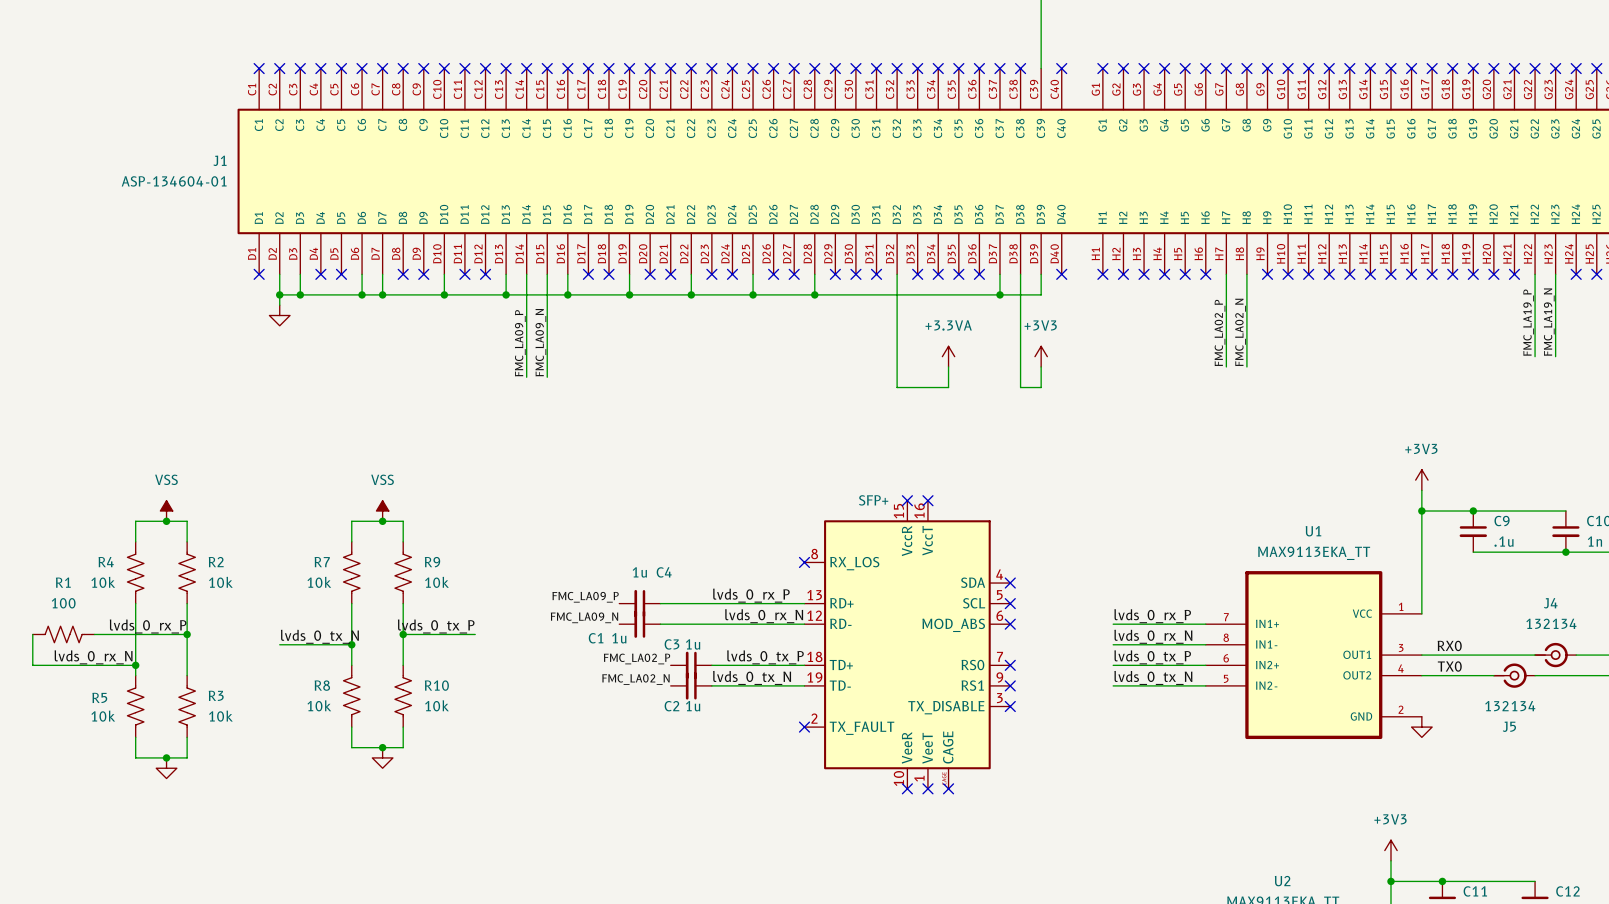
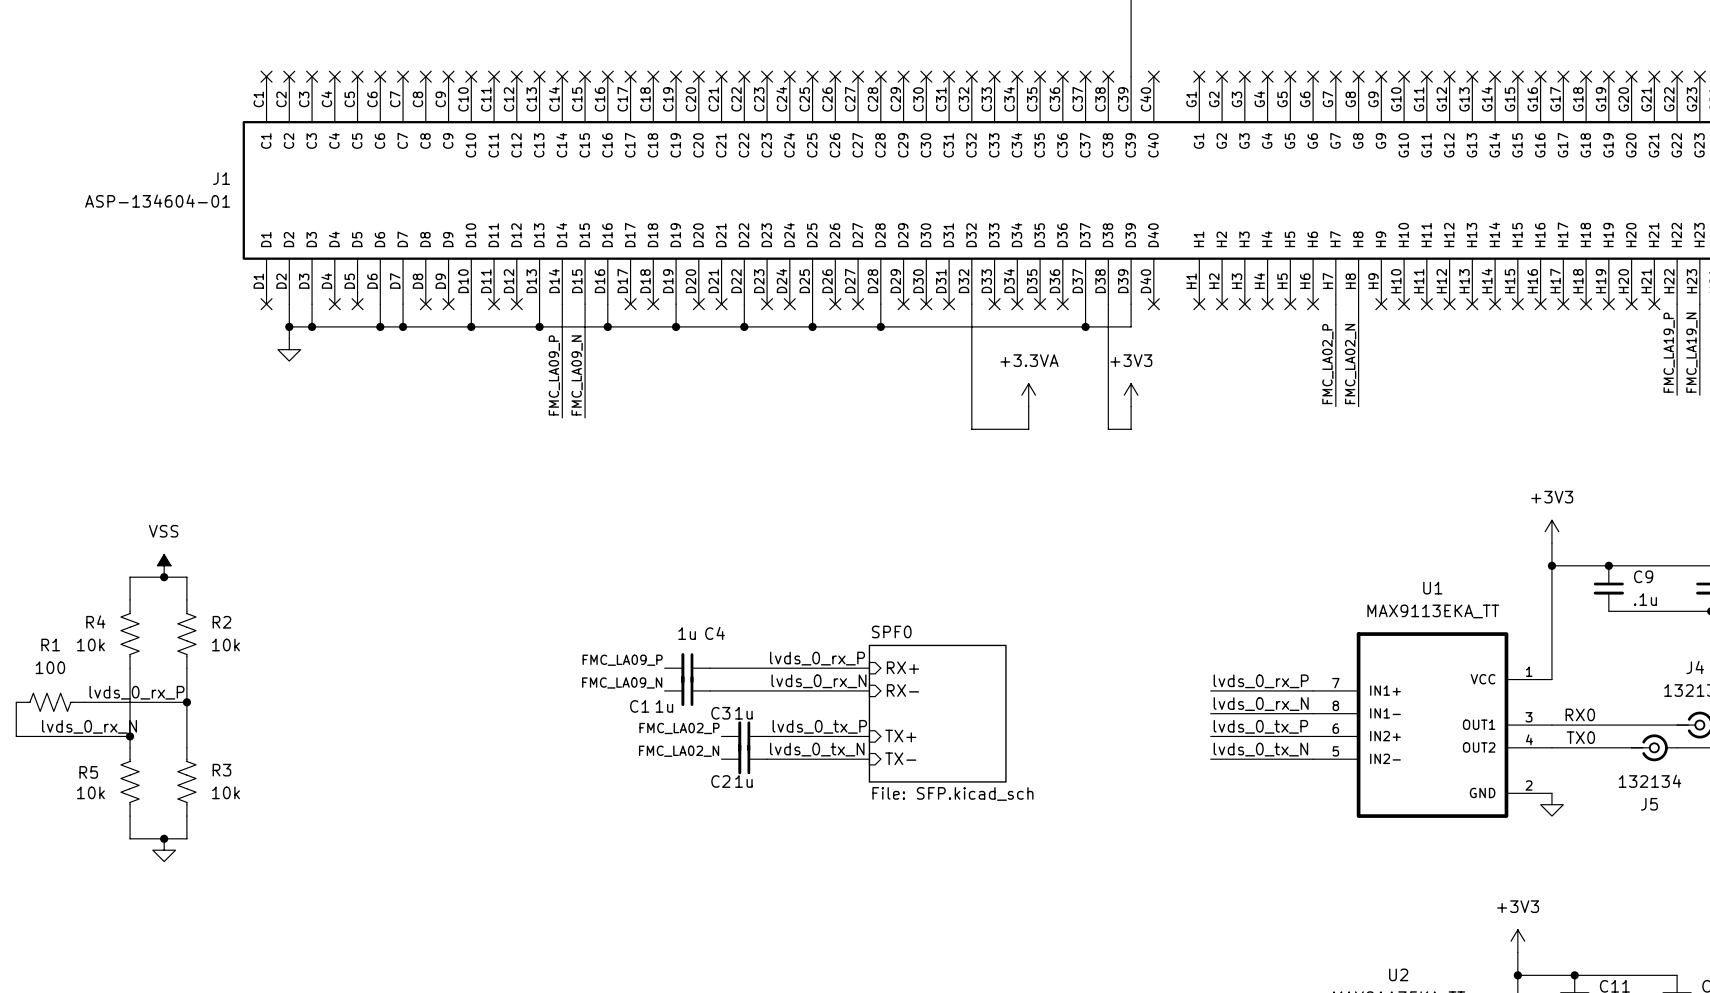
no-connect mark: (907, 500) -> none
no-connect mark: (927, 500) -> none
power symbol: VSS (382, 511) -> none
junction: (382, 521) -> none
wire: (351, 541) (351, 521) (403, 521) (403, 541) -> none
no-connect mark: (804, 562) -> none
R7: 10k (351, 572) -> none
R9: 10k (403, 572) -> none
no-connect mark: (1010, 583) -> none
wire: (351, 603) (351, 665) -> none
wire: (403, 603) (403, 665) -> none
sheet pin: none -> RX+ (902, 667)
no-connect mark: (1010, 603) -> none
sheet pin: none -> RX- (902, 690)
no-connect mark: (1010, 624) -> none
label: lvds_0_tx_P (436, 626) -> none
wire: (403, 634) (475, 634) -> none
junction: (403, 634) -> none
label: lvds_0_tx_N (319, 636) -> none
wire: (279, 644) (351, 644) -> none
junction: (351, 644) -> none
sheet SPF0: none -> File: SFP.kicad_sch (937, 713)
part: SFP+ (907, 644) -> none
sheet pin: none -> TX+ (900, 736)
no-connect mark: (1010, 665) -> none
sheet pin: none -> TX- (900, 758)
no-connect mark: (1010, 685) -> none
R8: 10k (351, 696) -> none
R10: 10k (403, 696) -> none
no-connect mark: (1010, 706) -> none
wire: (351, 727) (351, 747) (403, 747) (403, 727) -> none
no-connect mark: (804, 727) -> none
junction: (382, 747) -> none
power symbol: (382, 757) -> none
no-connect mark: (907, 788) -> none
no-connect mark: (927, 788) -> none
no-connect mark: (948, 788) -> none

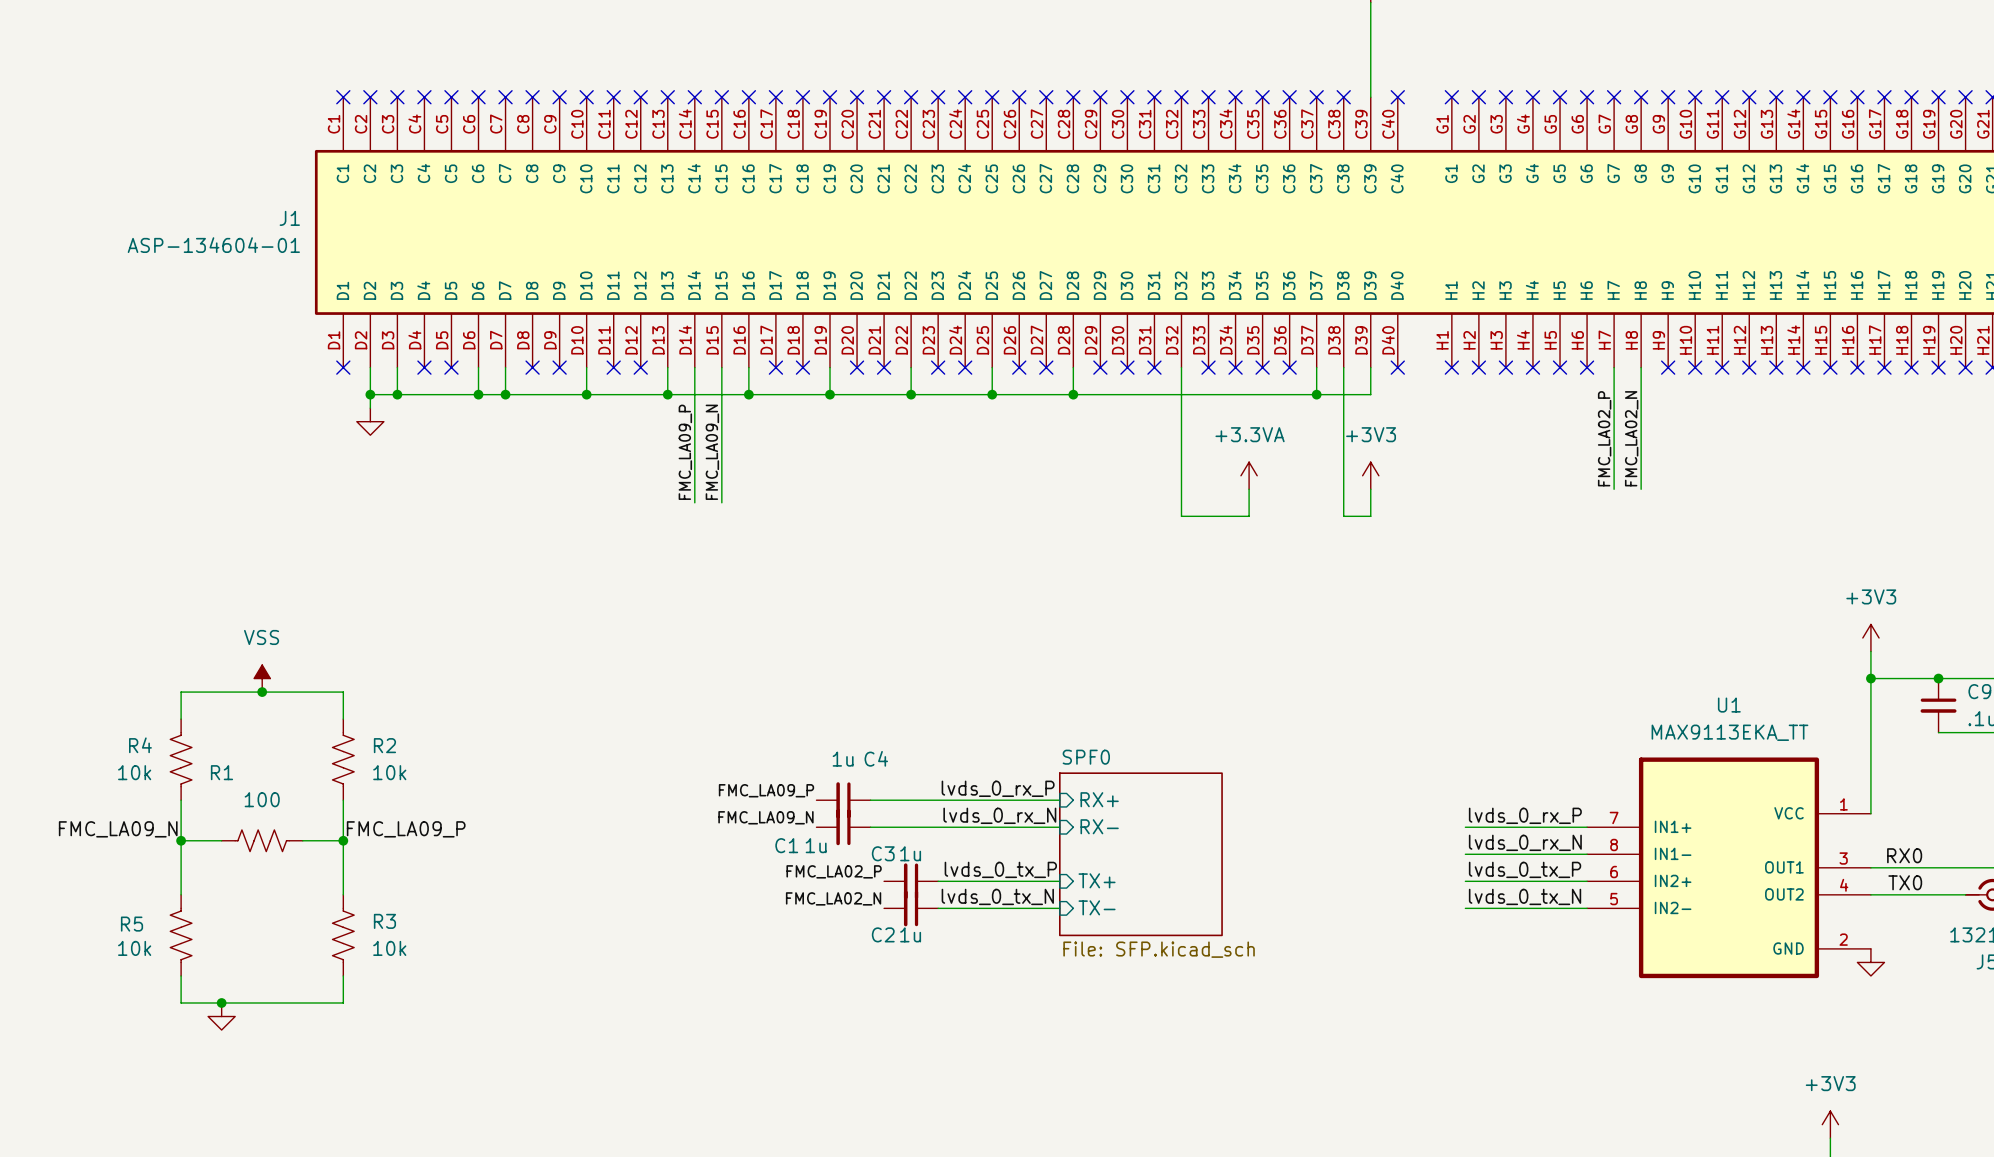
power symbol position: VSS (164, 565) -> VSS (262, 678)
junction position: (164, 577) -> (262, 692)
wire: (186, 577) (186, 599) -> (248, 692) (343, 692) (343, 719)
R2 position: (186, 634) -> (343, 759)
R1 name position: R1 (50, 645) -> R1 (221, 772)
wire: (186, 668) (186, 747) -> (343, 800) (343, 894)
label: none -> FMC_LA09_N (118, 829)
label: lvds_0_rx_P (136, 692) -> none
label: none -> FMC_LA09_P (406, 829)
wire: (16, 702) (16, 736) (130, 736) -> none
R1 position: (50, 702) -> (262, 840)
wire: (84, 702) (130, 702) -> none
junction: none -> (181, 840)
junction: (186, 702) -> none
wire: none -> (302, 840) (343, 840)
junction: none -> (343, 840)
label: lvds_0_rx_N (89, 726) -> none
junction: (130, 736) -> none
R3 position: (186, 781) -> (343, 935)
wire: (186, 816) (186, 838) -> (343, 975) (343, 1002) (248, 1002)

